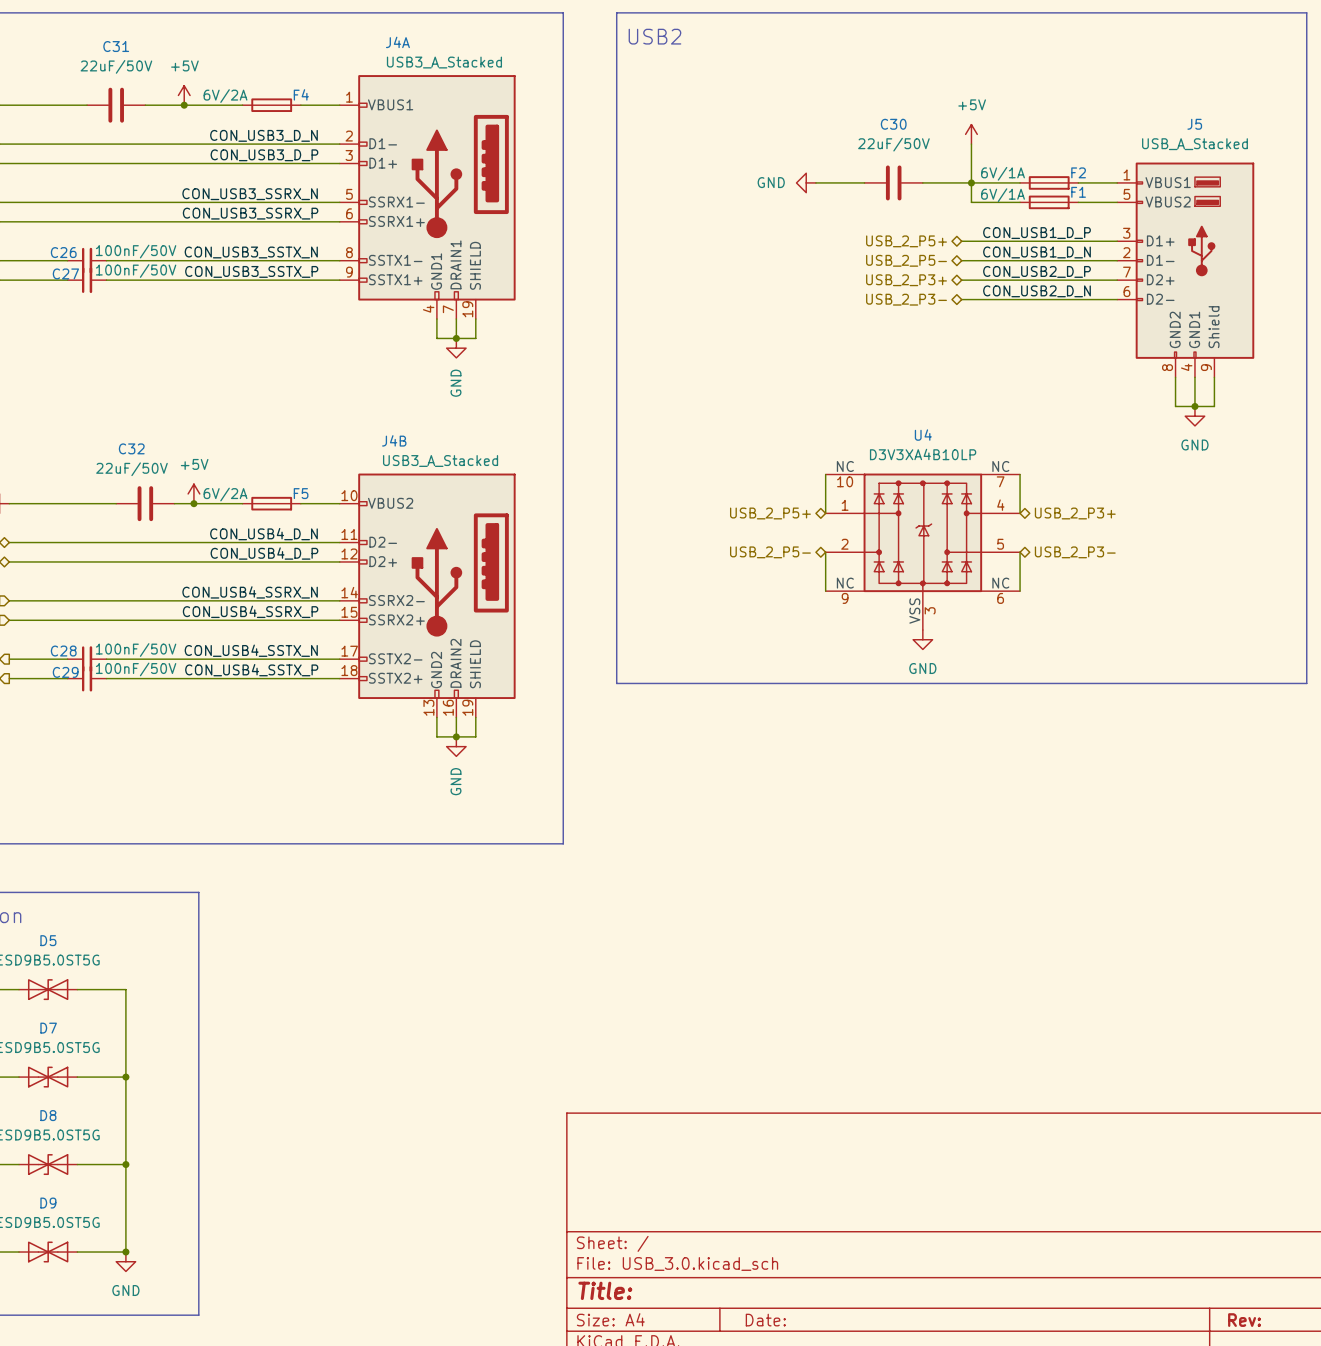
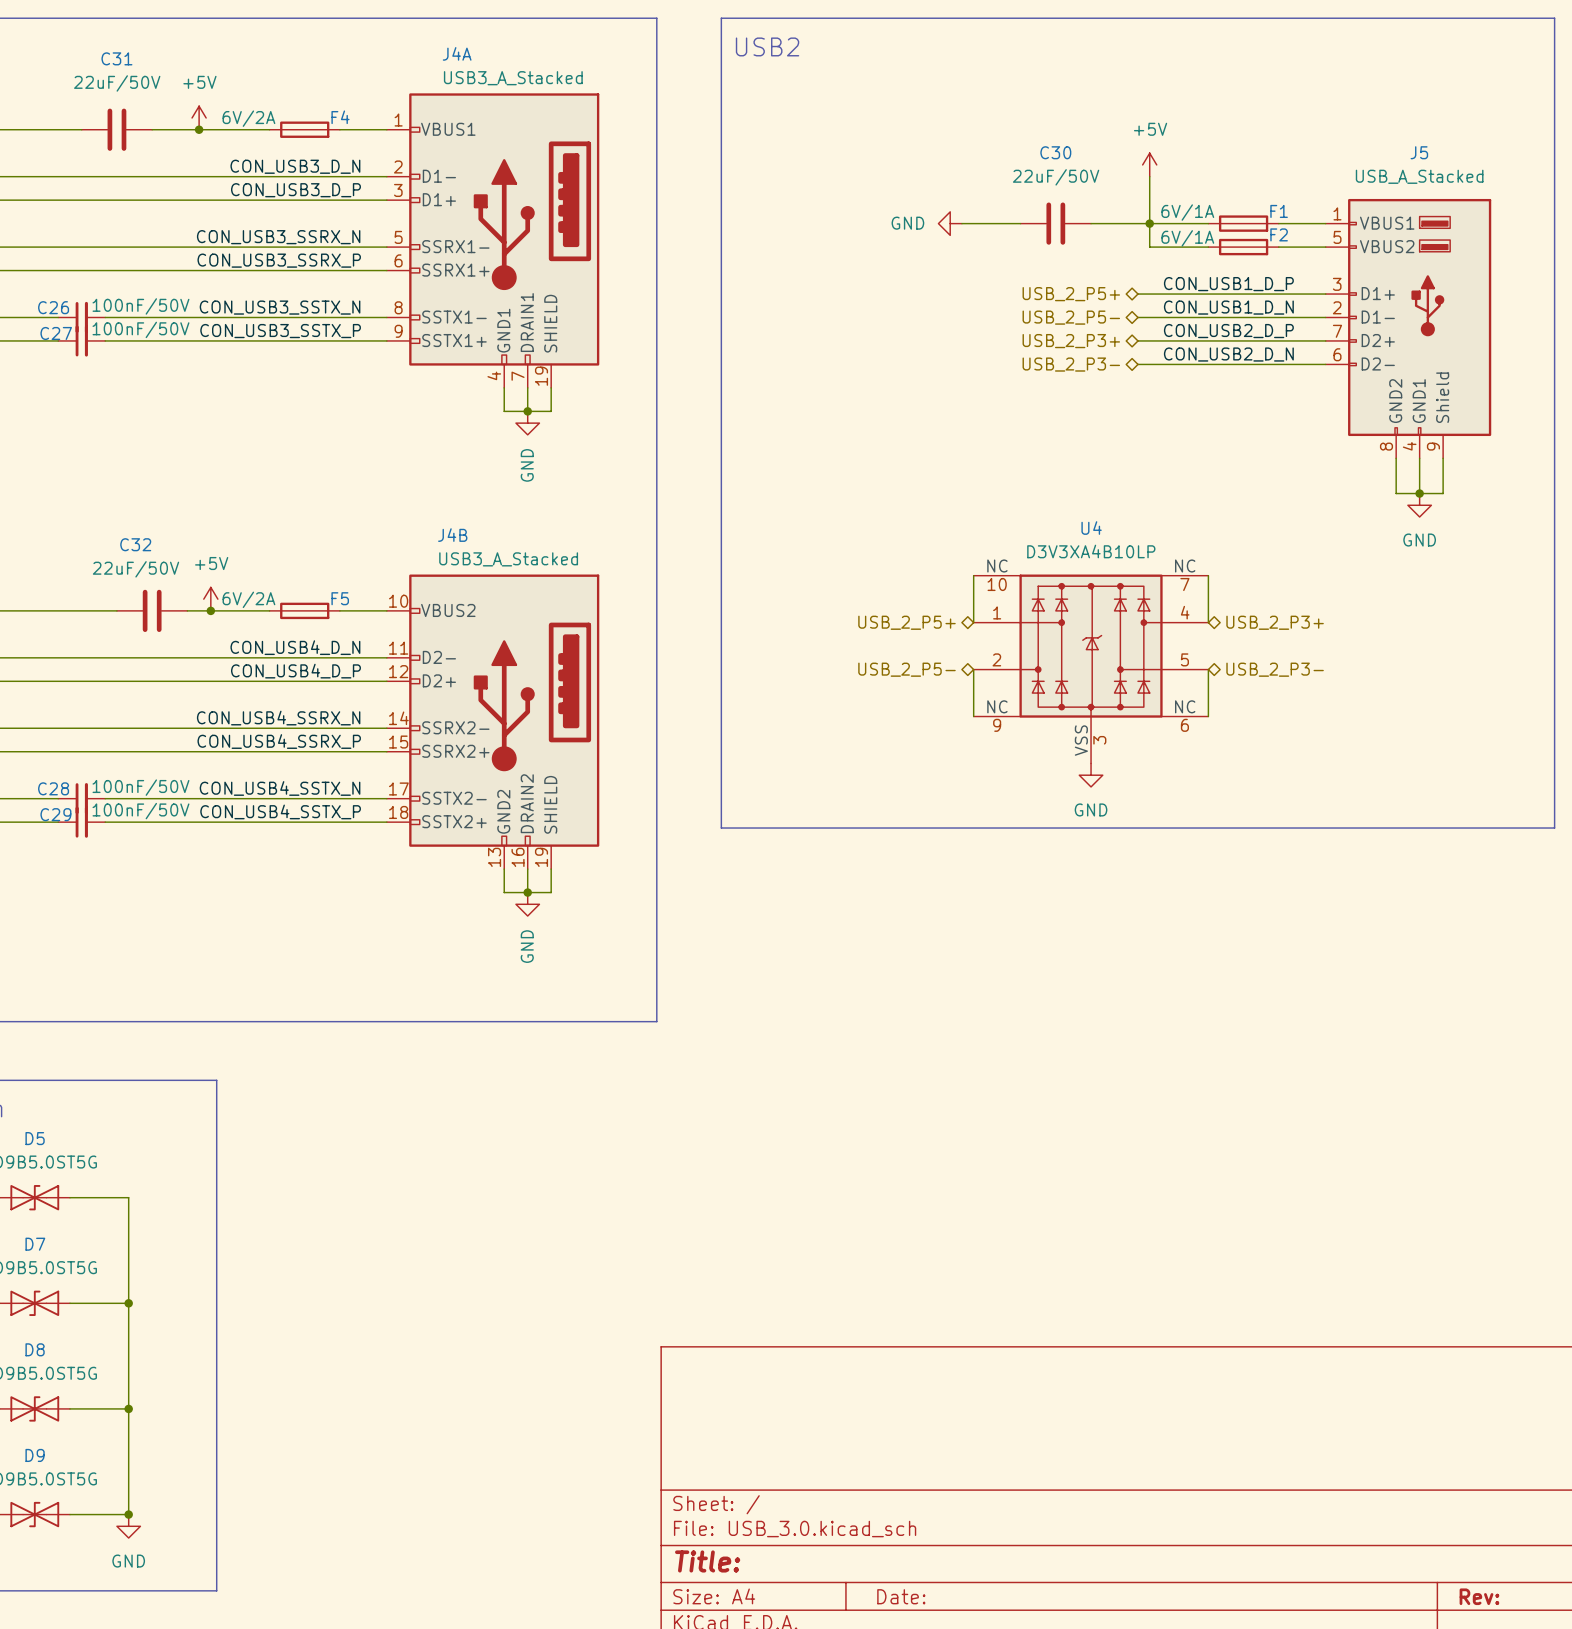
F2 name: F2 (1078, 172) -> F1 (1279, 211)
F1 name: F1 (1078, 192) -> F2 (1279, 234)

